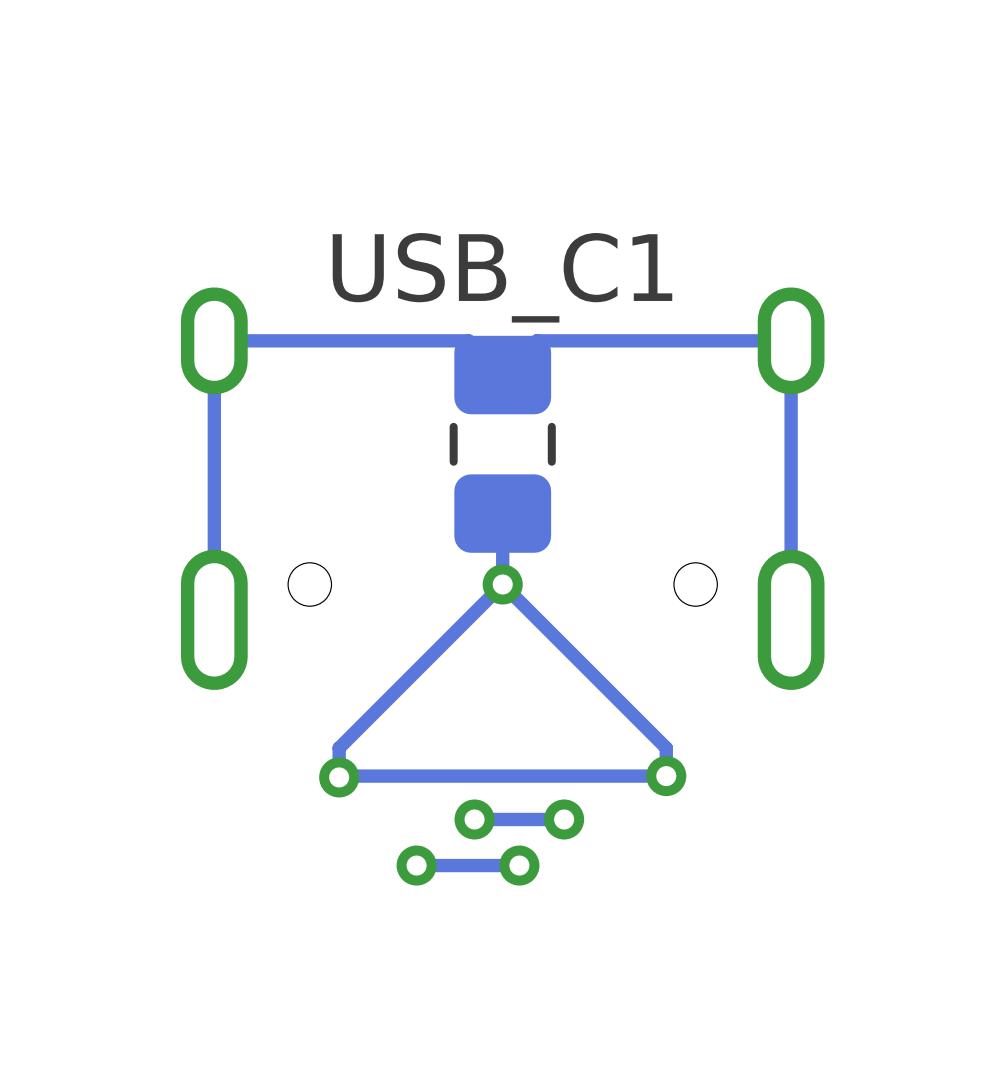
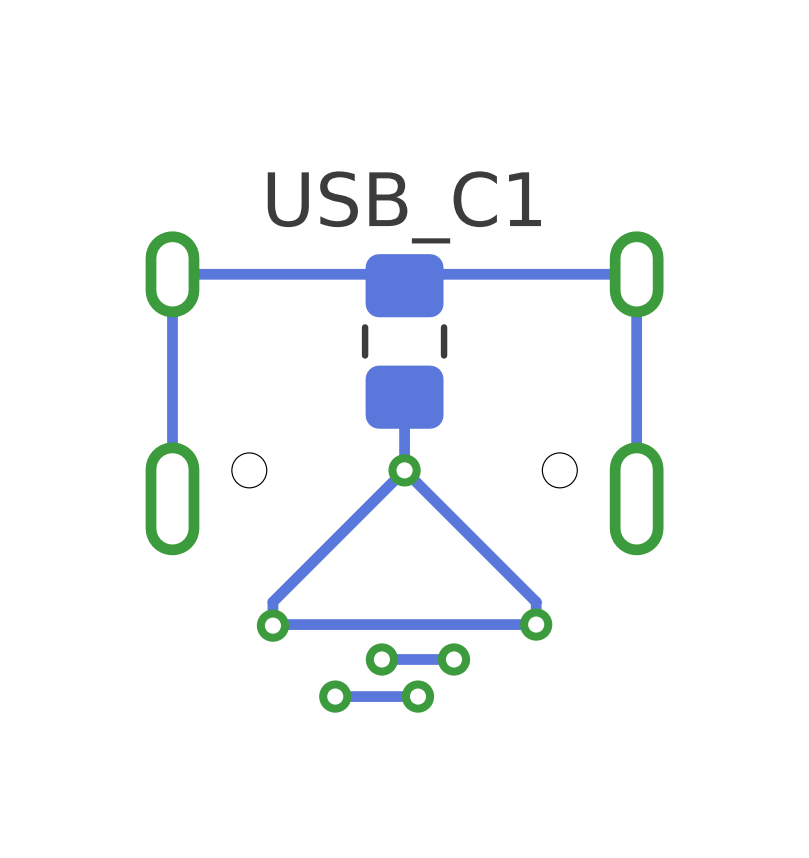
USB_C1 position: (502, 444) -> (404, 341)

